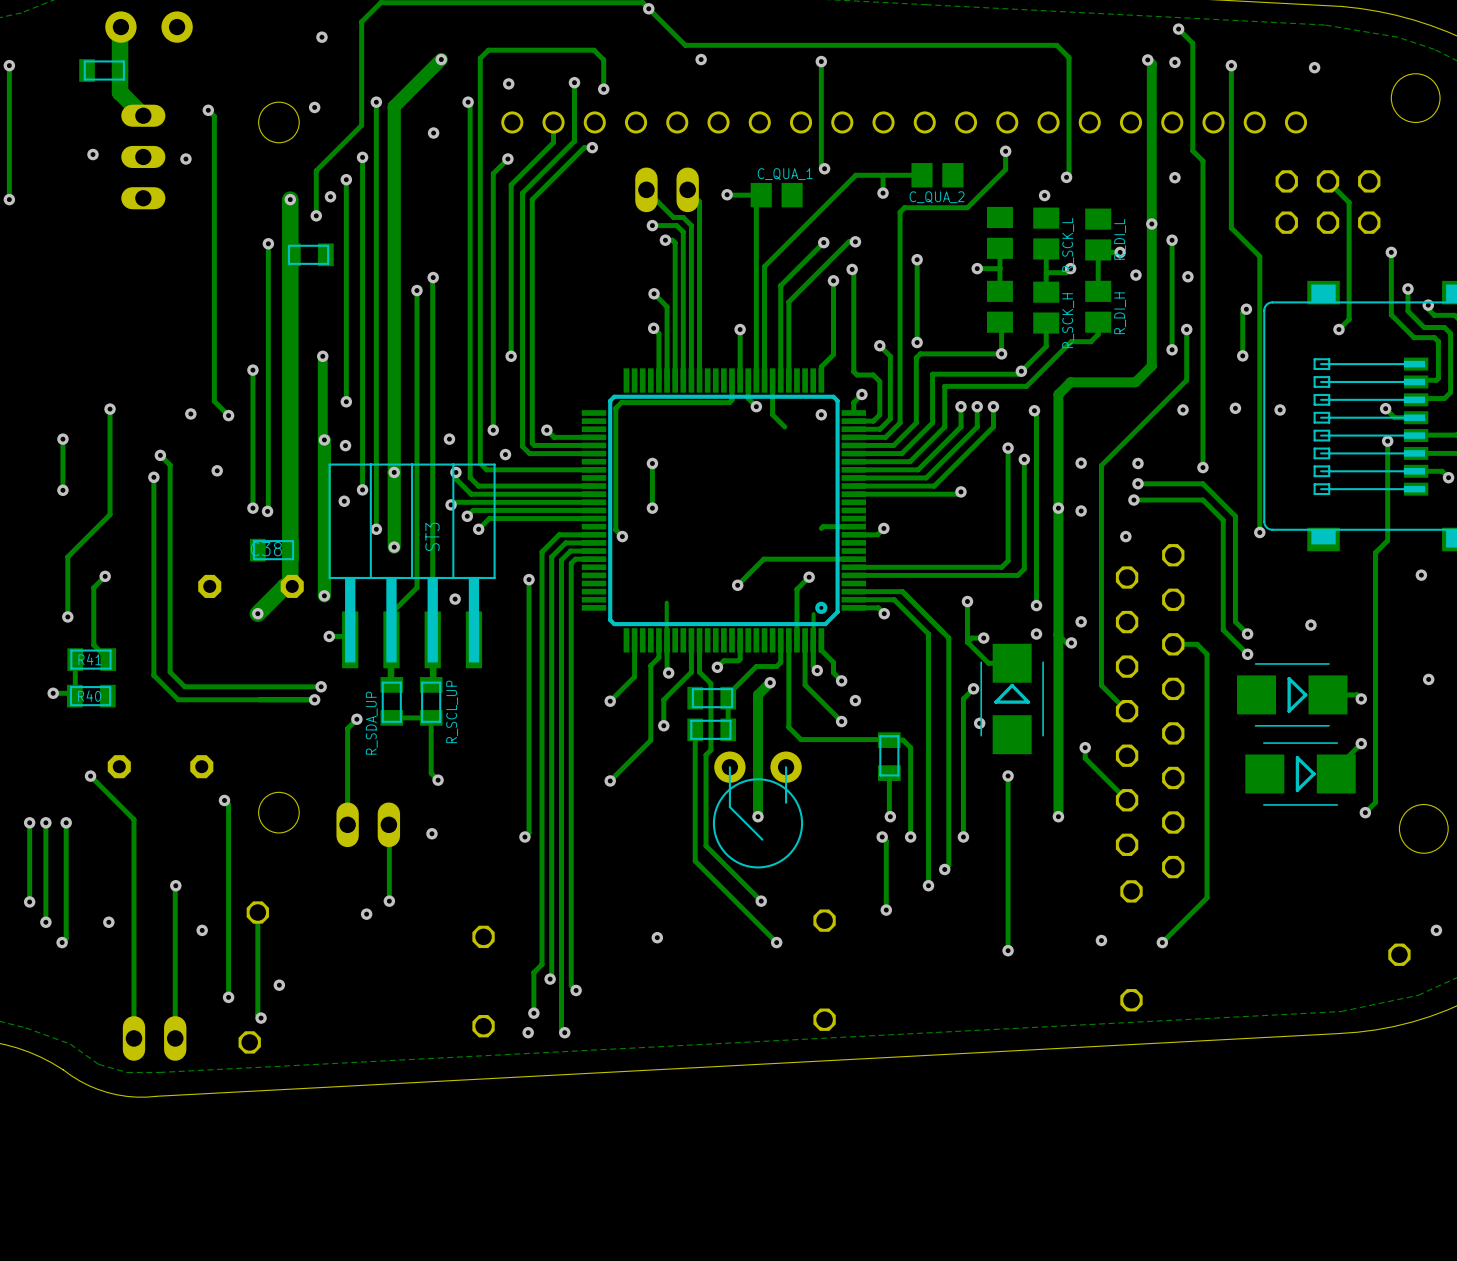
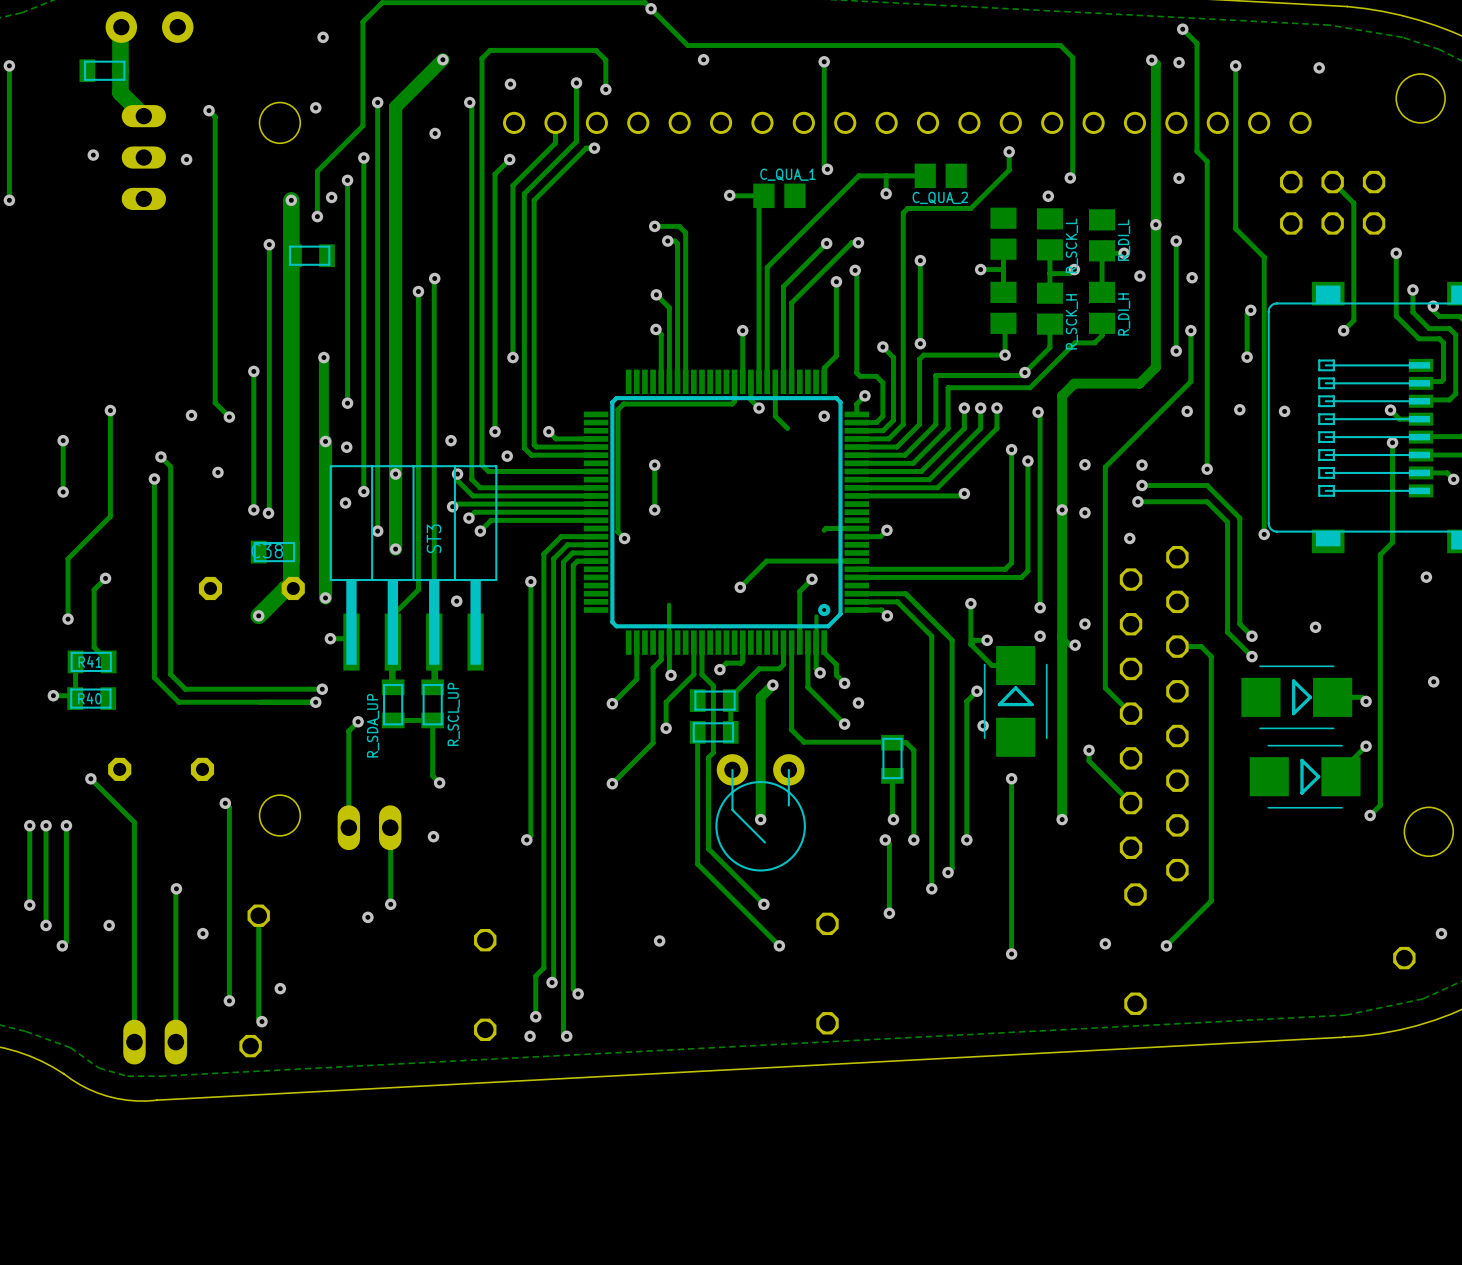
track: (646, 189) (673, 217) (683, 217) (691, 225) (691, 380) -> none
part: (667, 189) -> none
track: (687, 189) (699, 201) (699, 380) -> none

